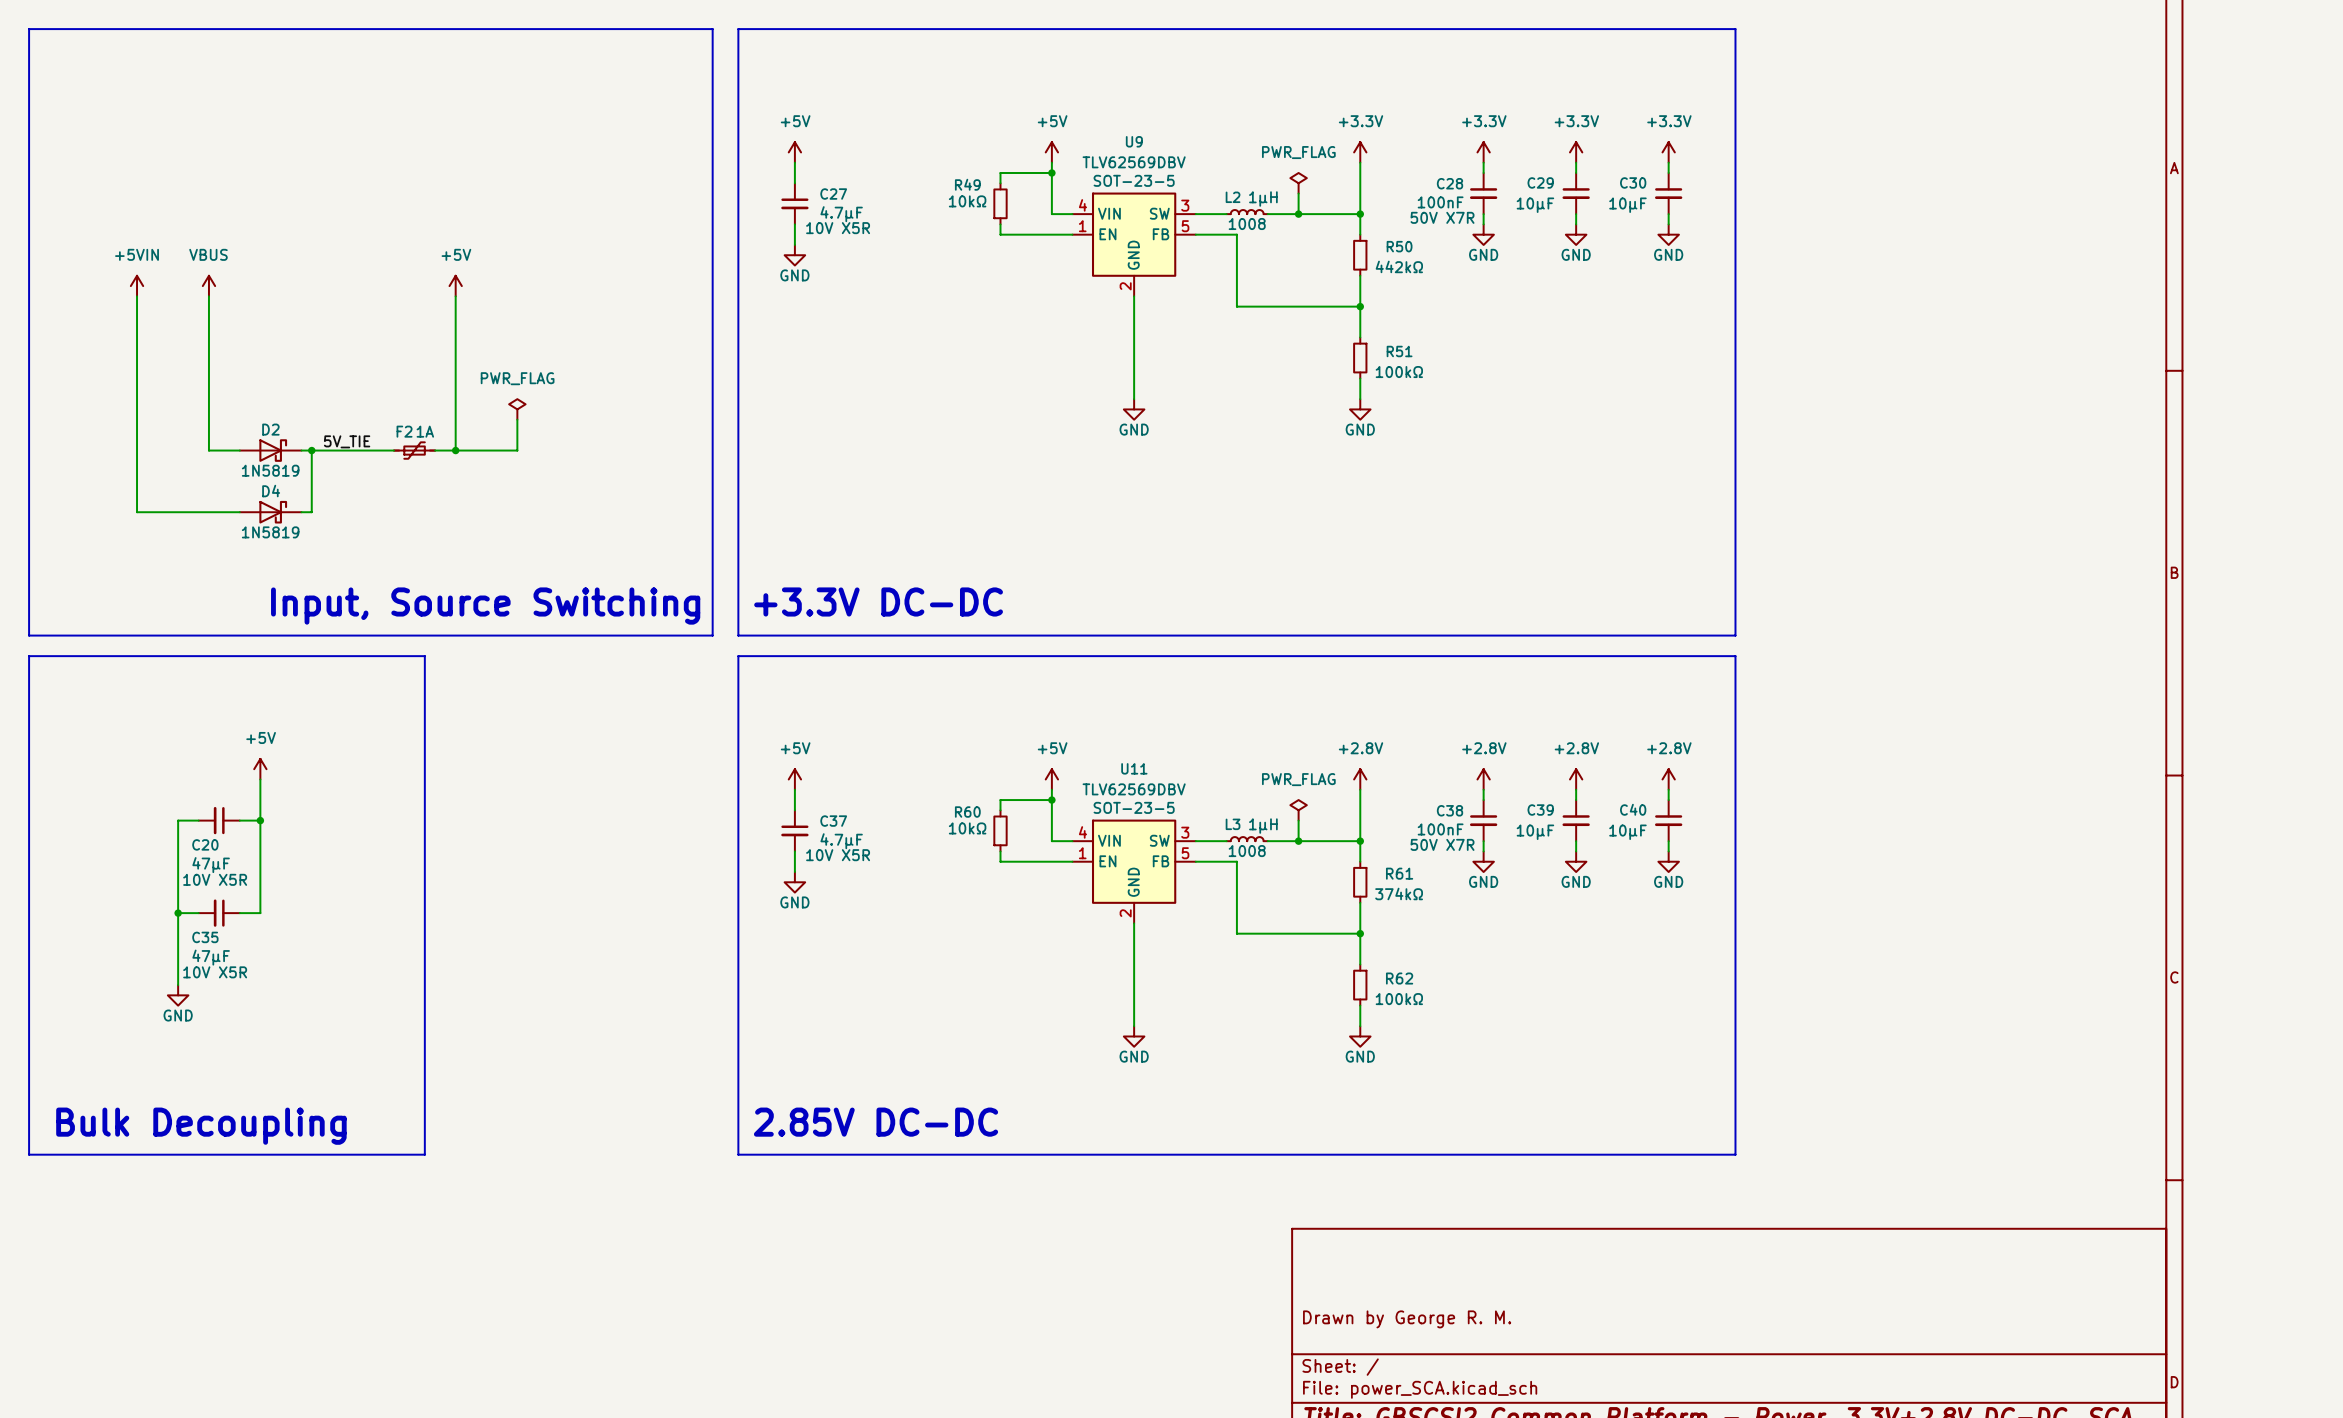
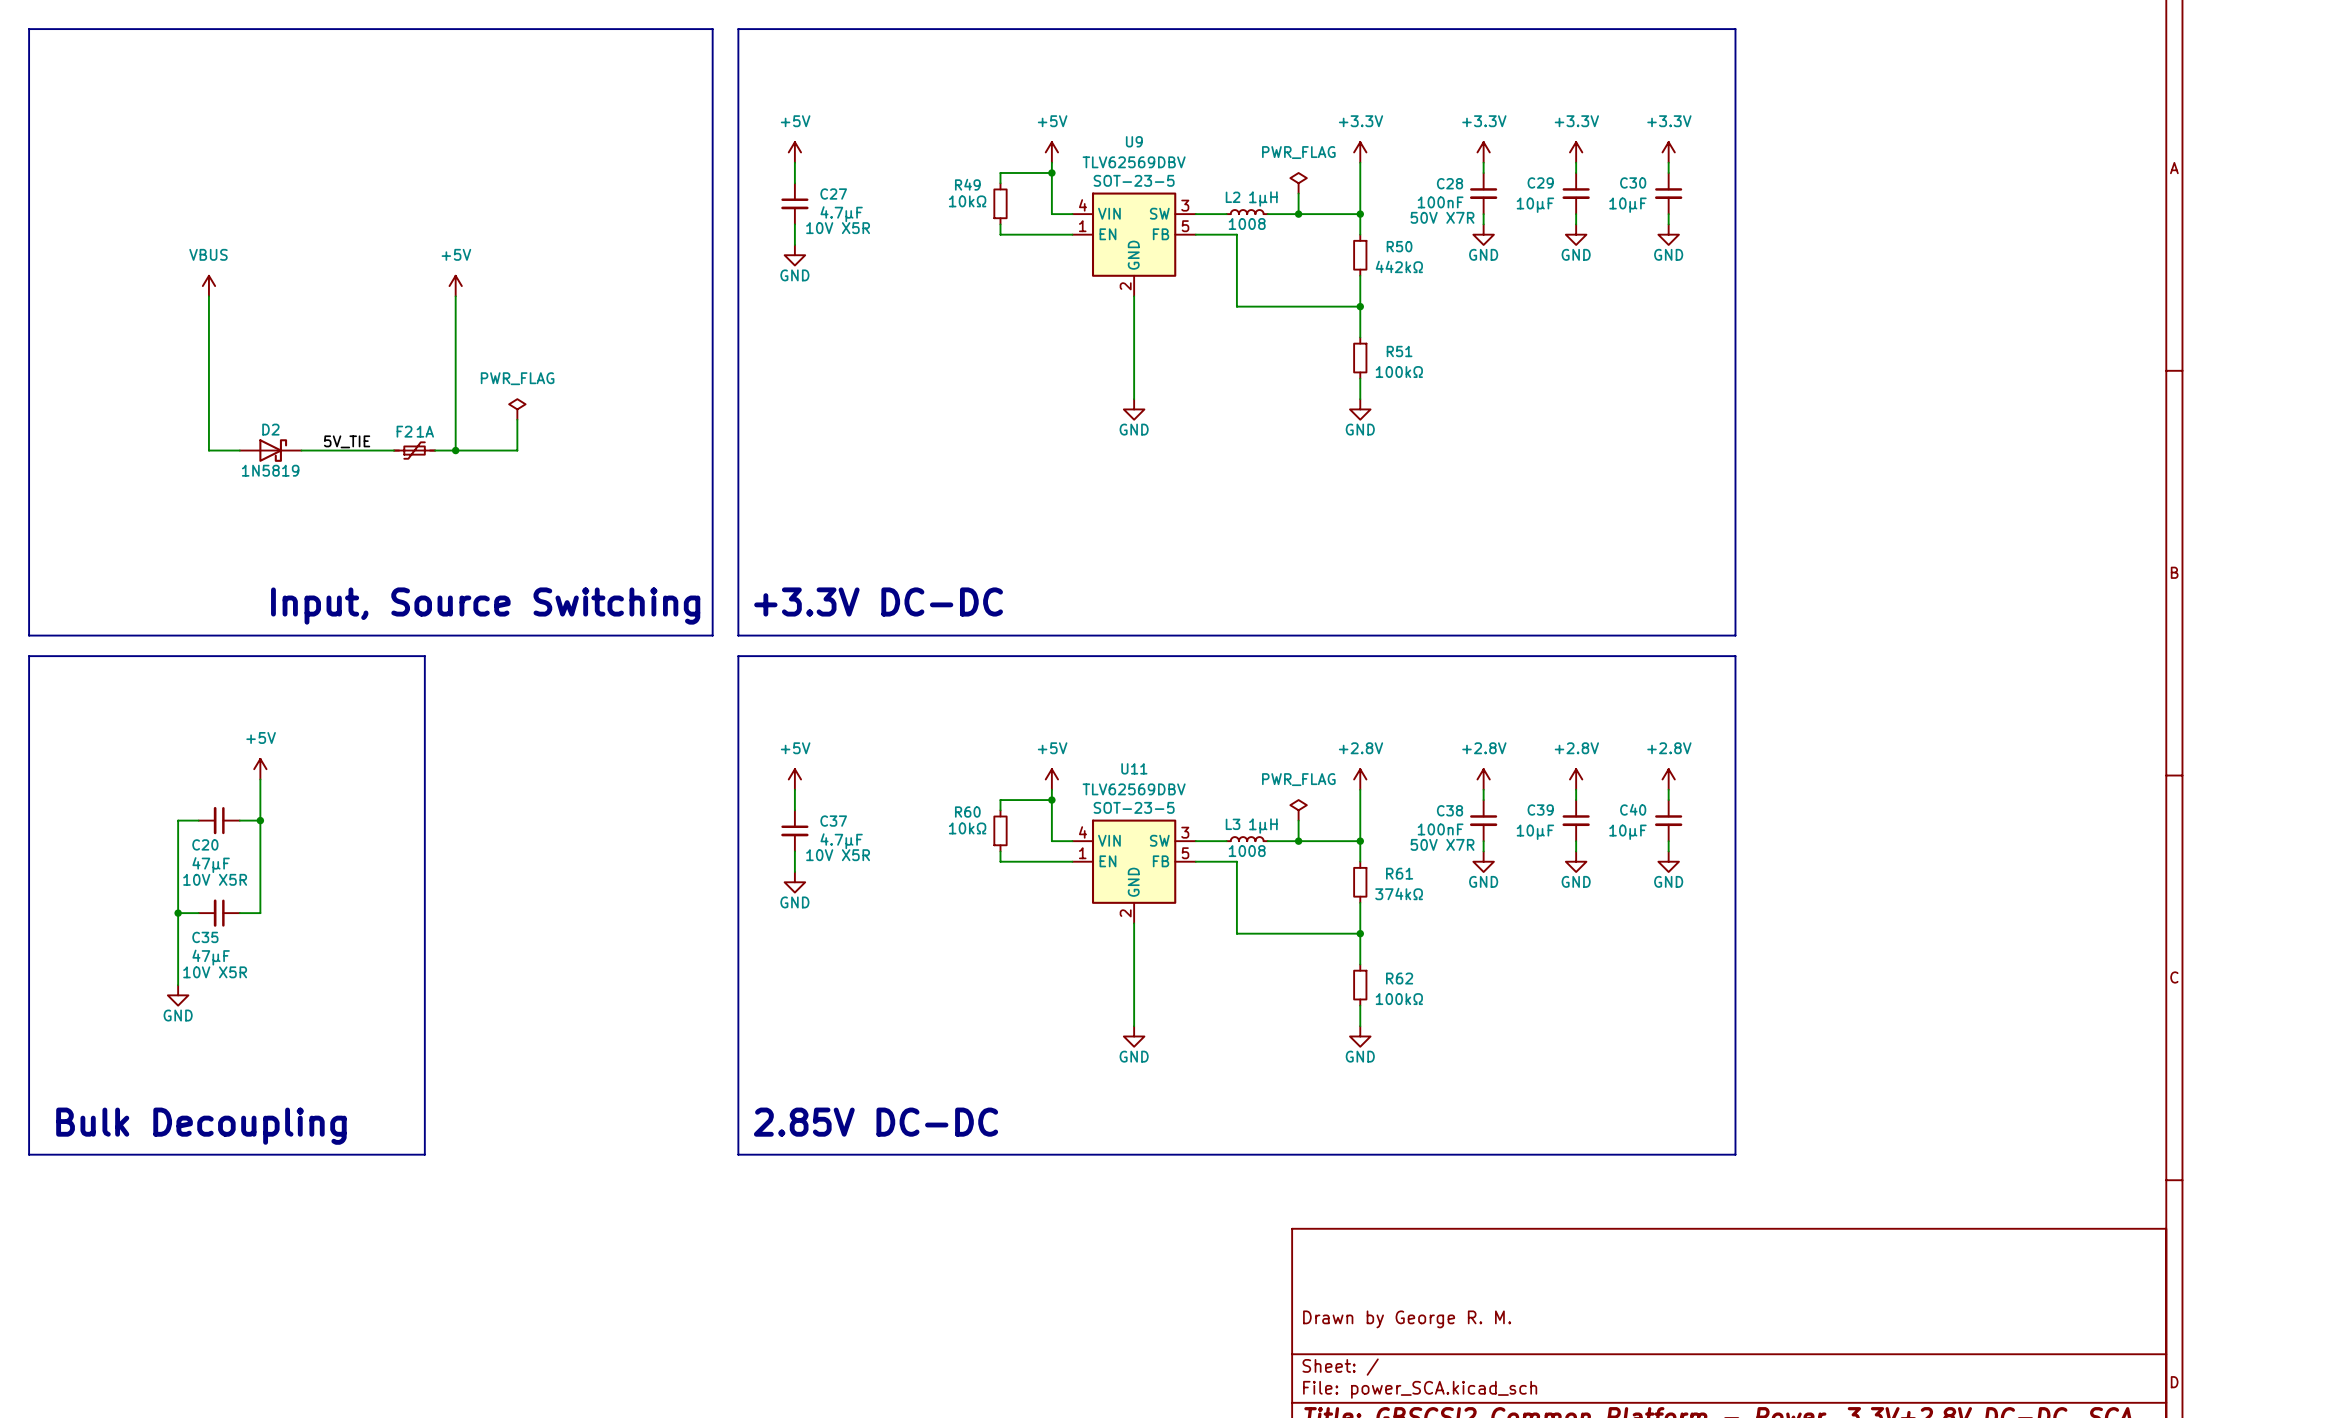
power symbol: +5VIN (137, 286) -> none
wire: (137, 296) (137, 512) (239, 512) -> none
wire: (311, 450) (311, 512) (301, 512) -> none
junction: (311, 450) -> none
D4: 1N5819 (270, 512) -> none

